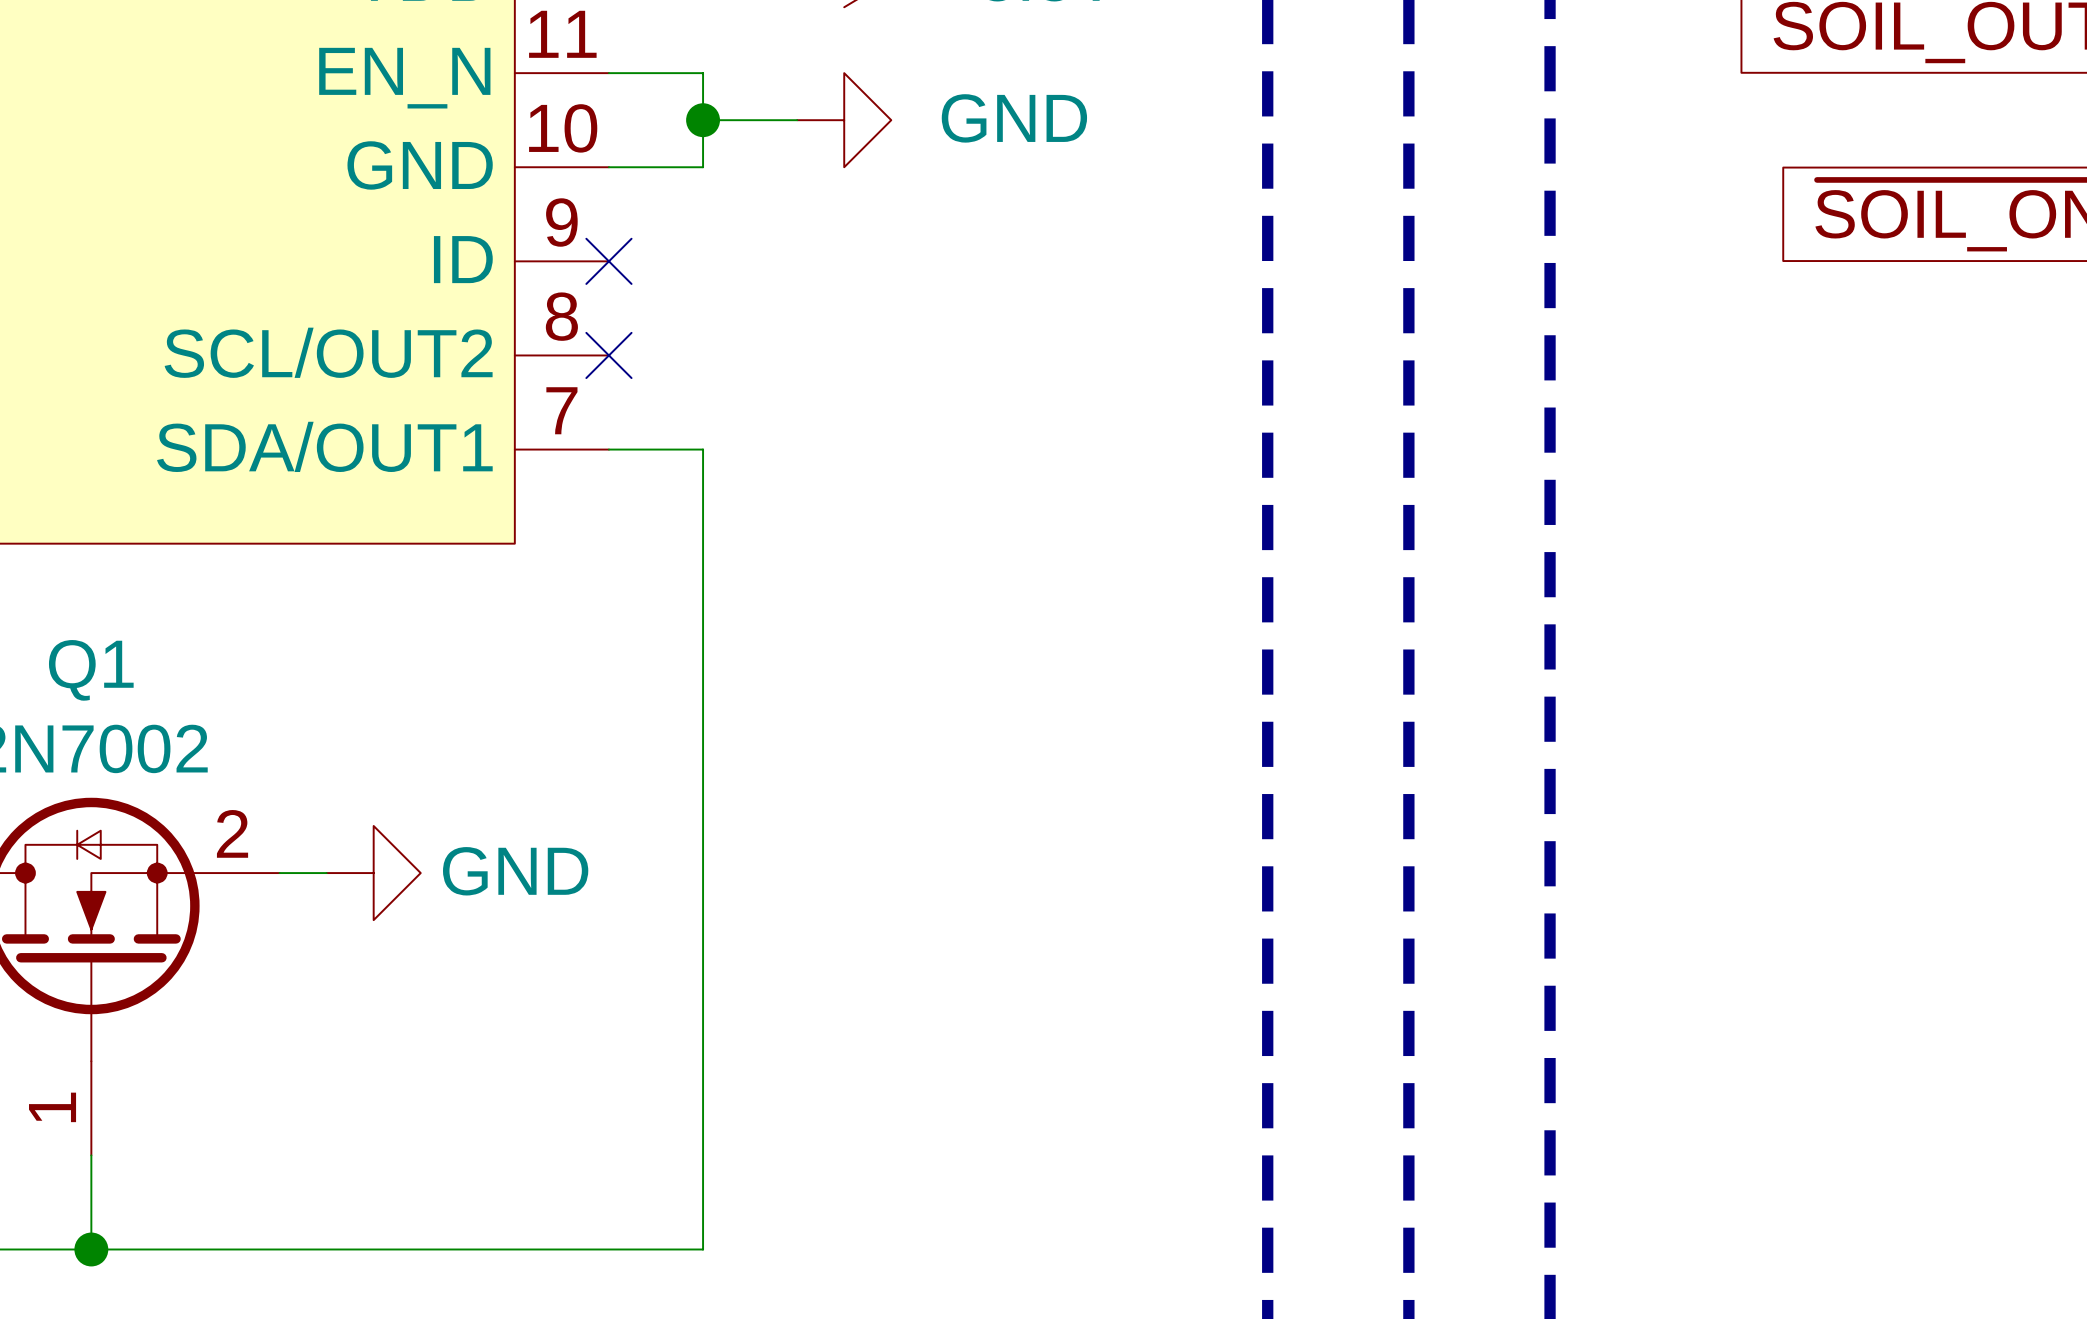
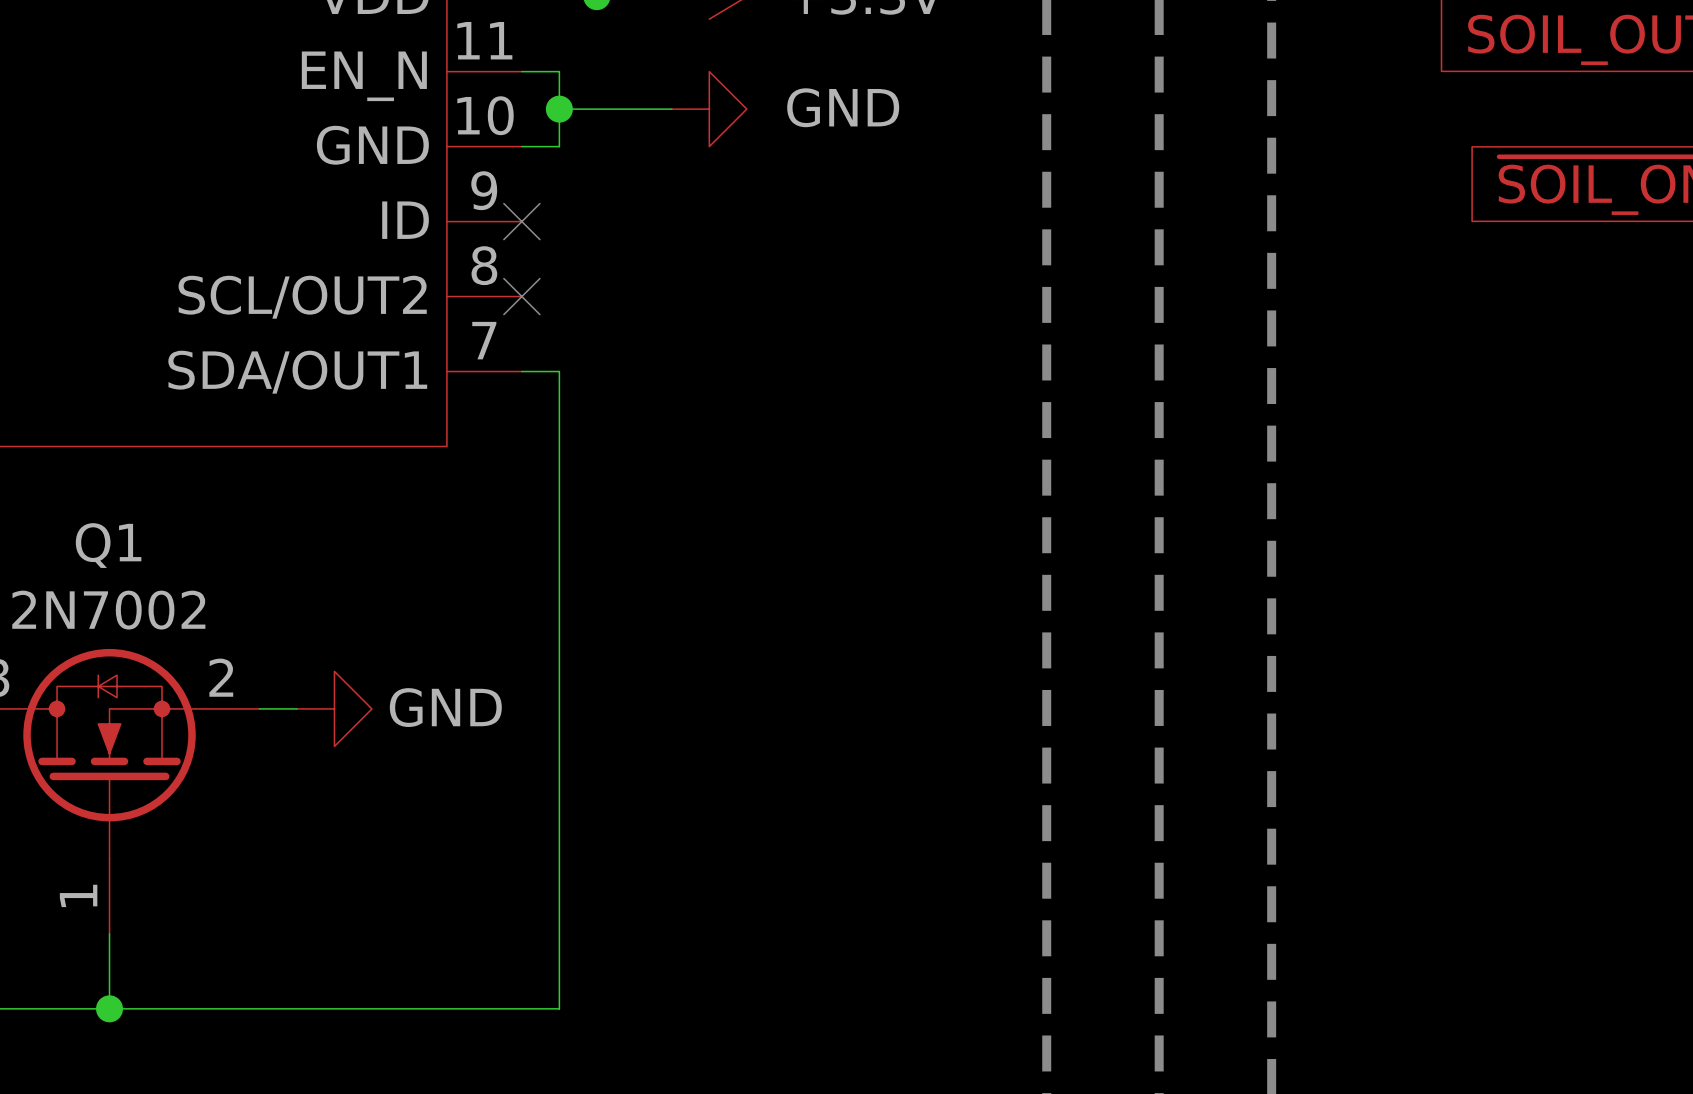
wire: (656, 73) (703, 73) (703, 167) (656, 167) -> (559, 71) (559, 146)
wire: none -> (559, 109) (596, 109)
junction position: (703, 120) -> (559, 109)
wire: (656, 449) (703, 449) (703, 1249) (656, 1249) -> (559, 371) (559, 1008)

